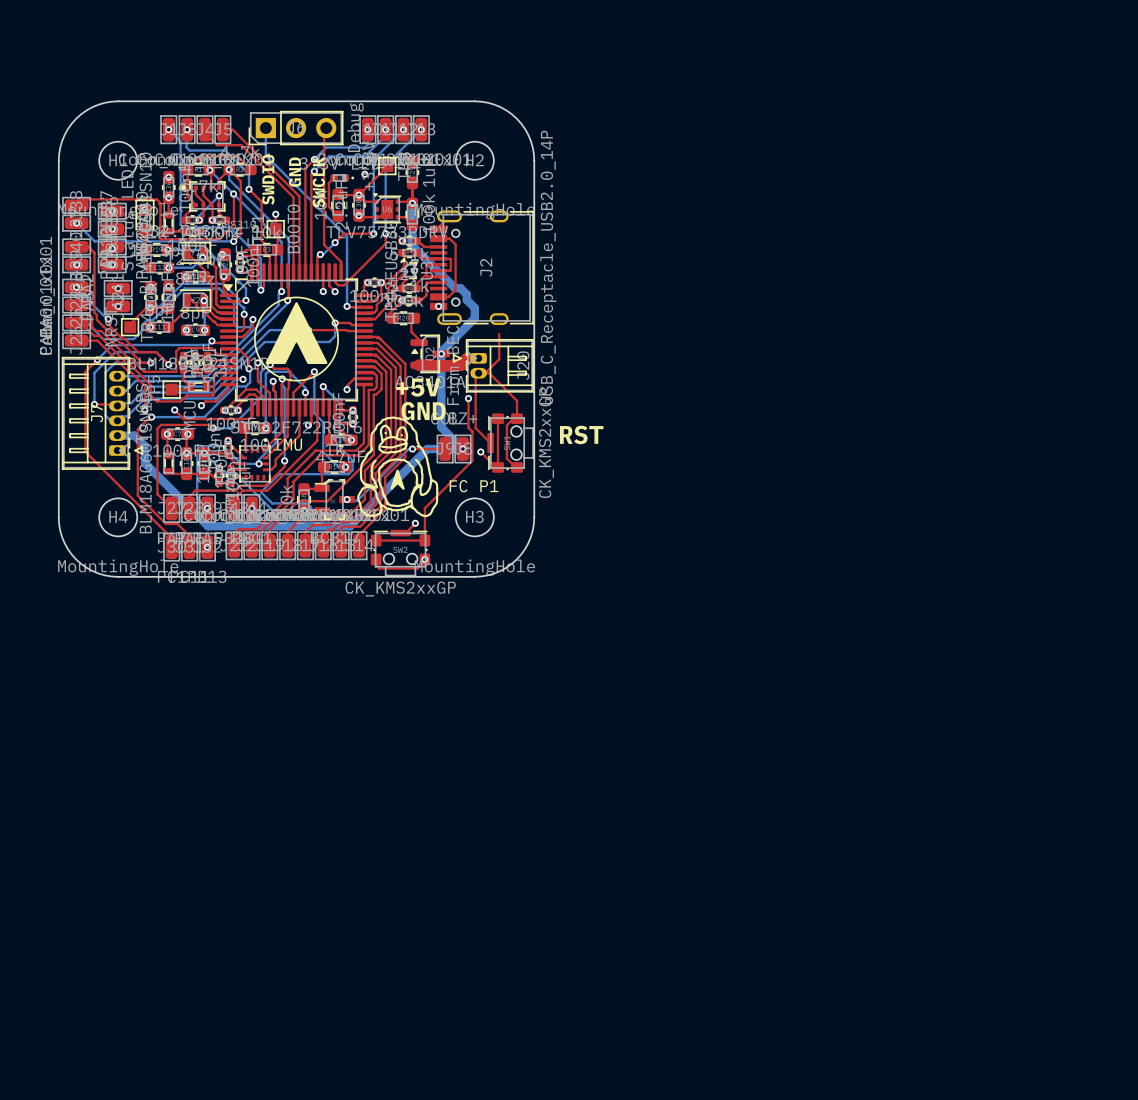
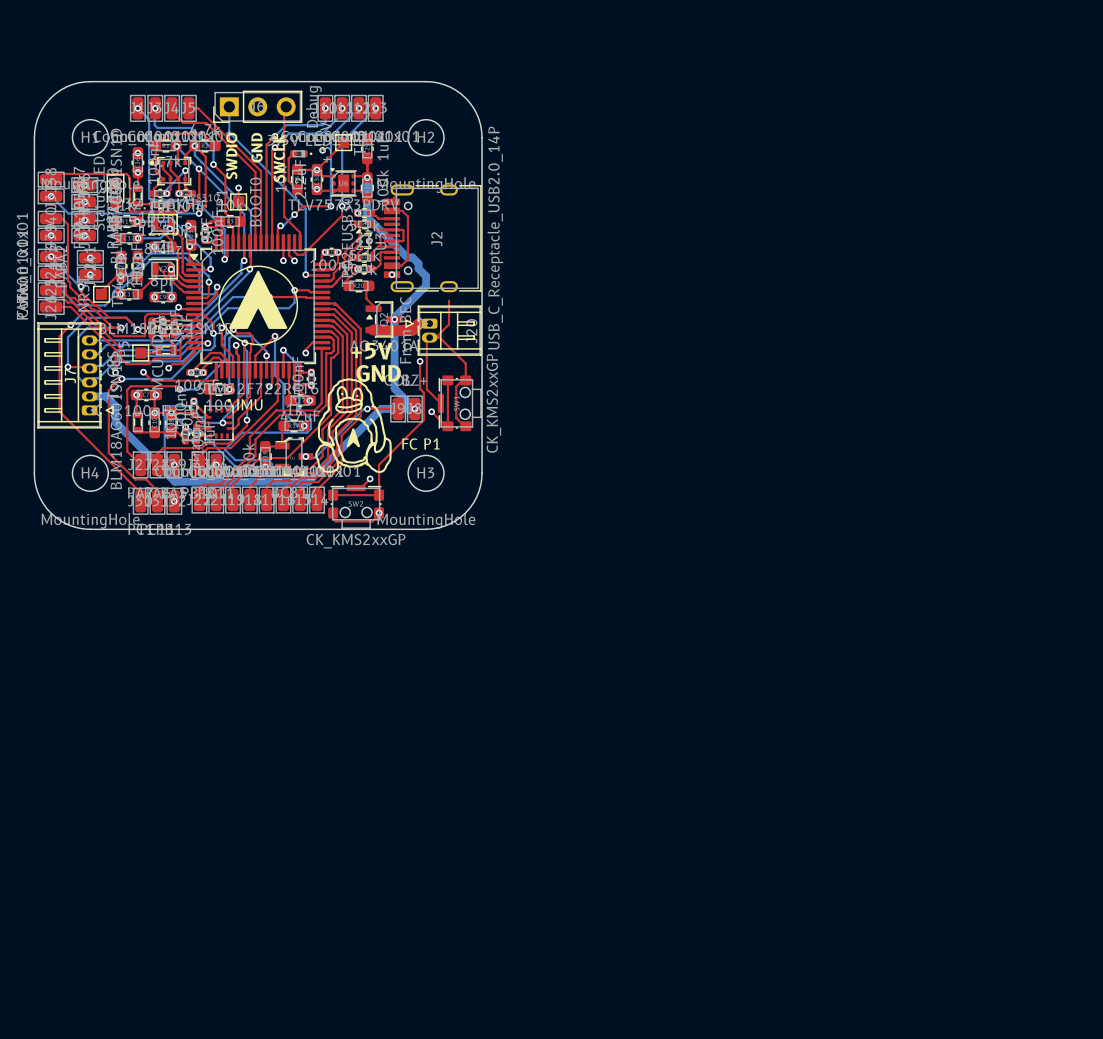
text: RST (581, 434) -> none

